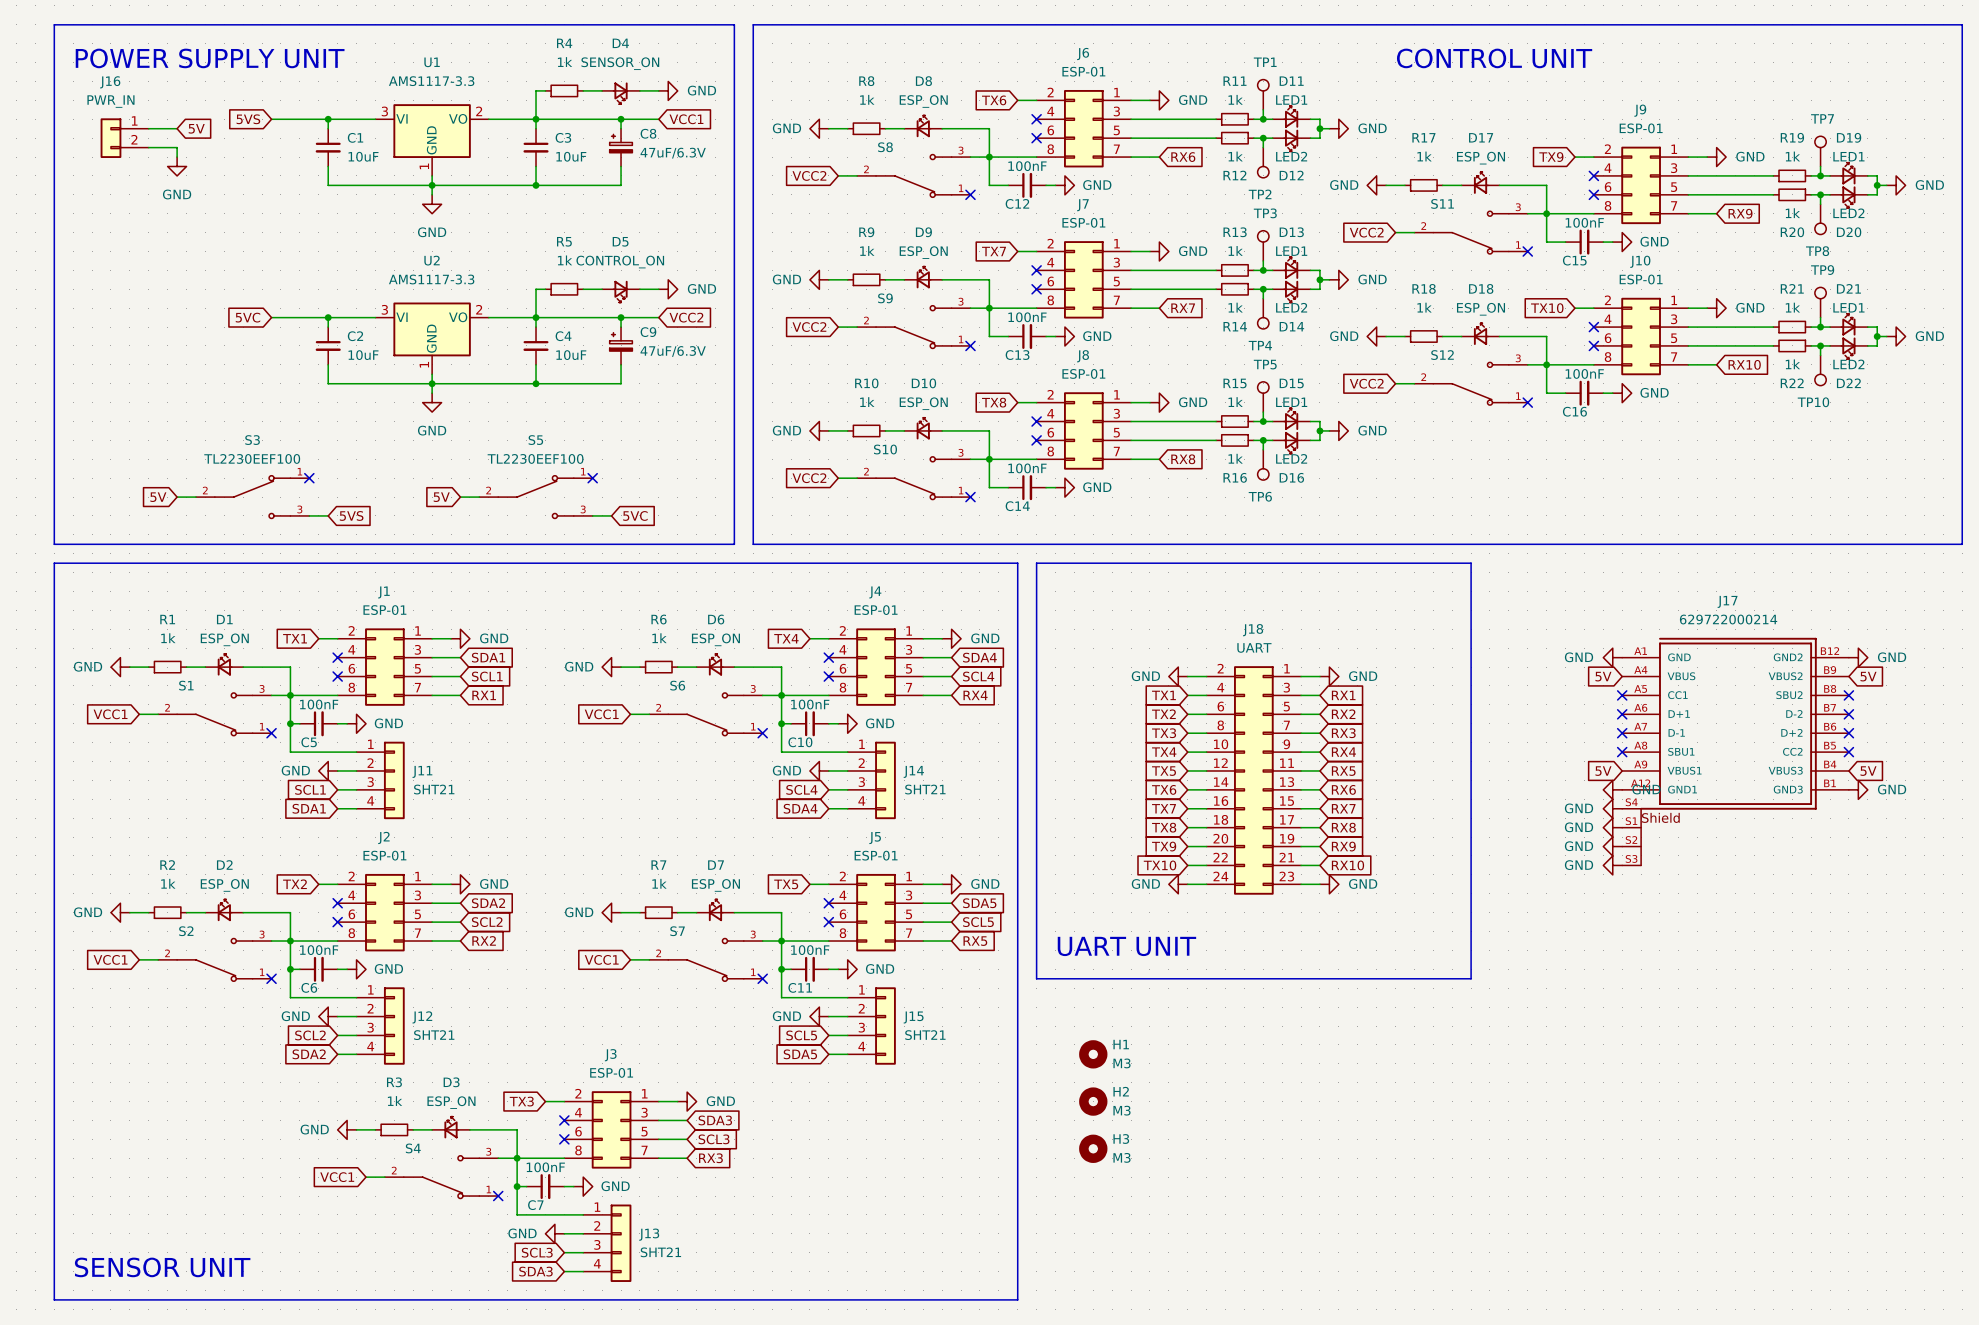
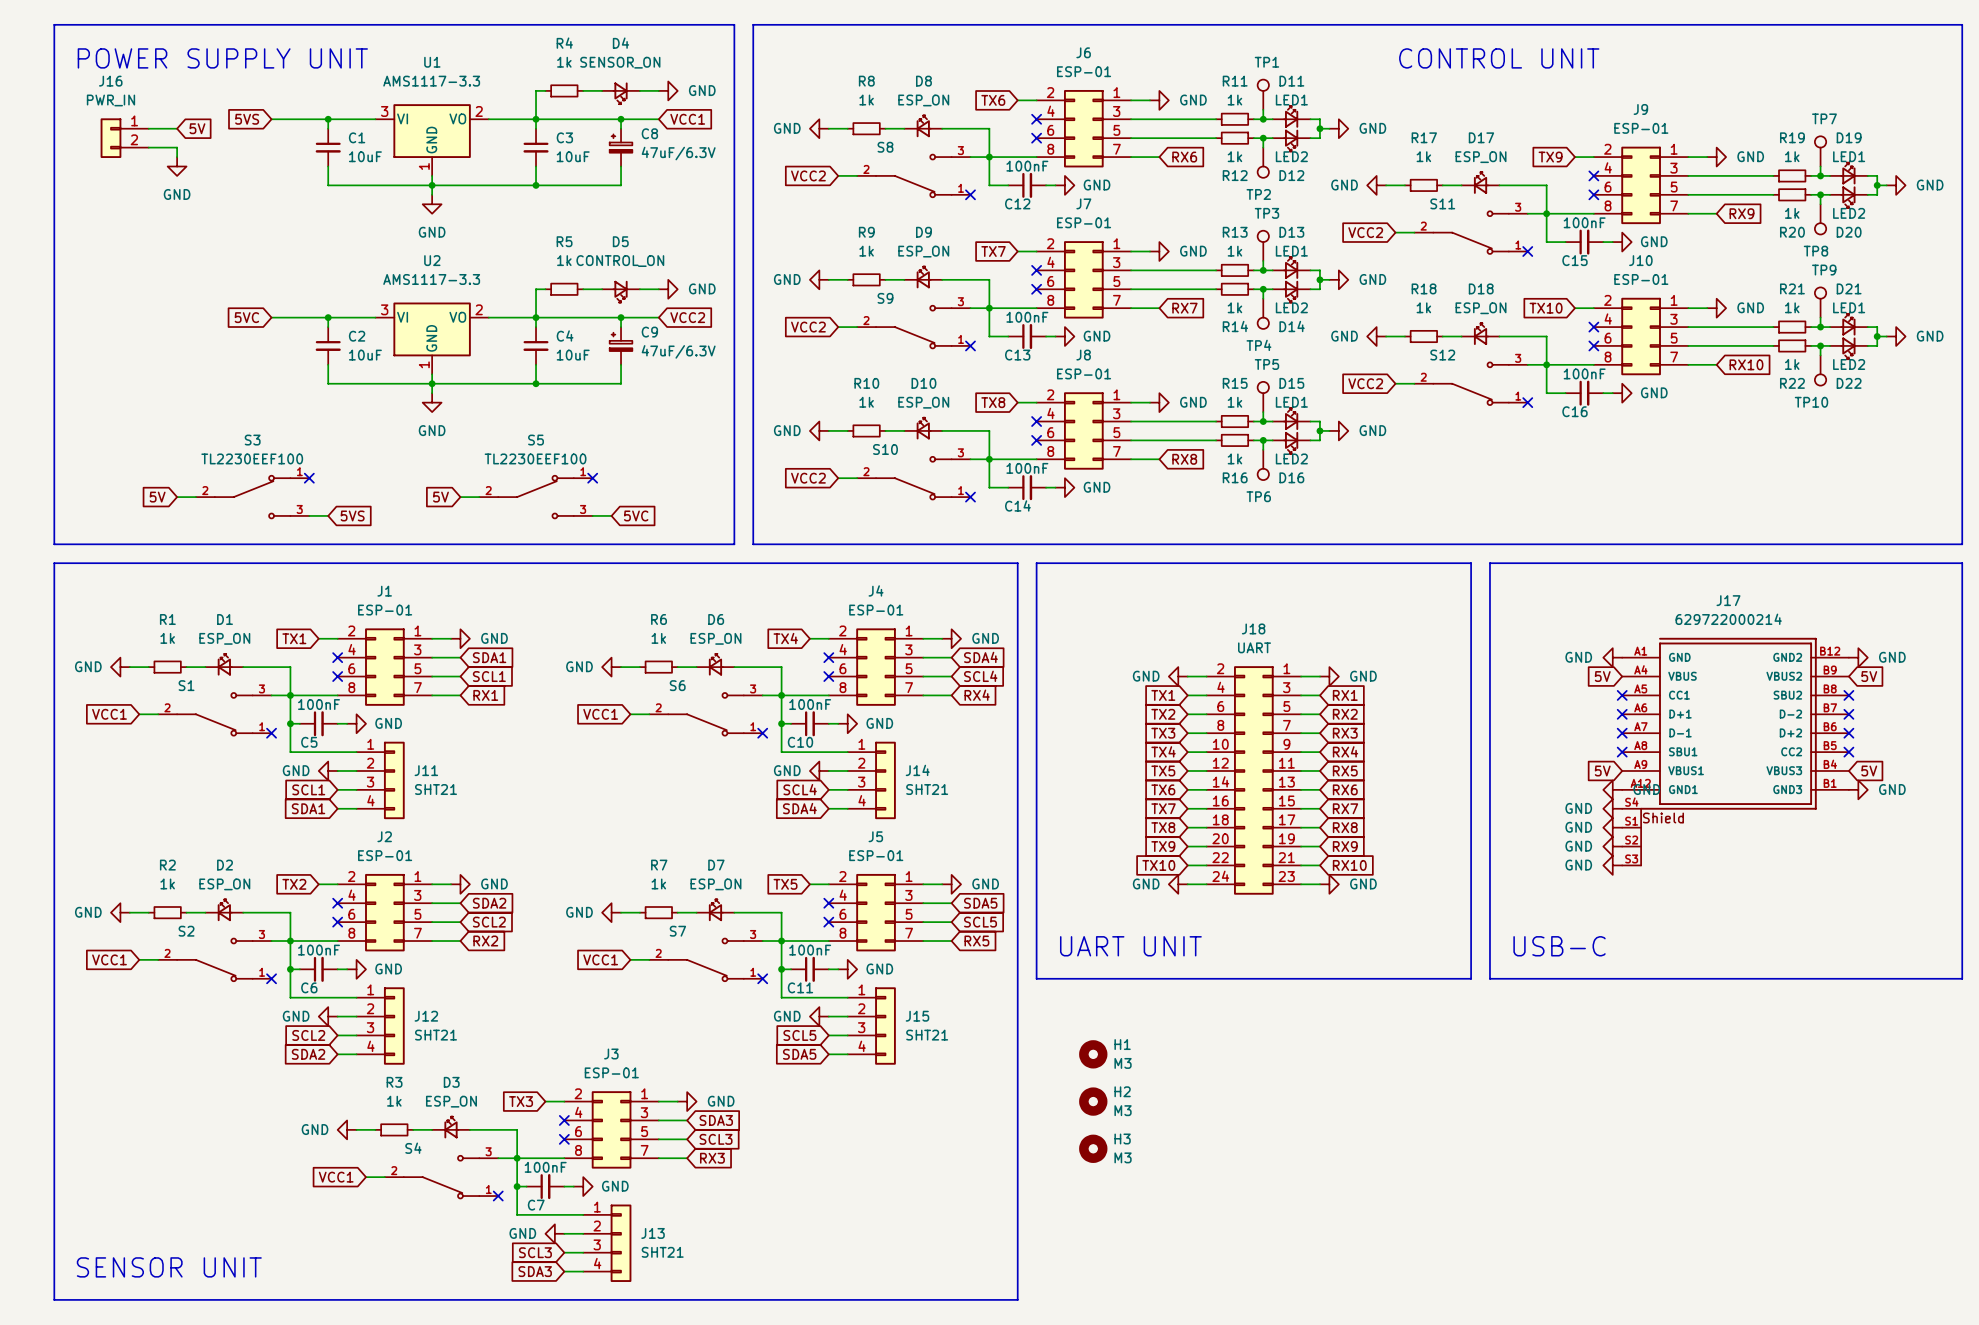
line: none -> (1489, 563) (1962, 563) (1962, 978) (1489, 978) (1489, 563)
text: none -> USB-C (1559, 946)

